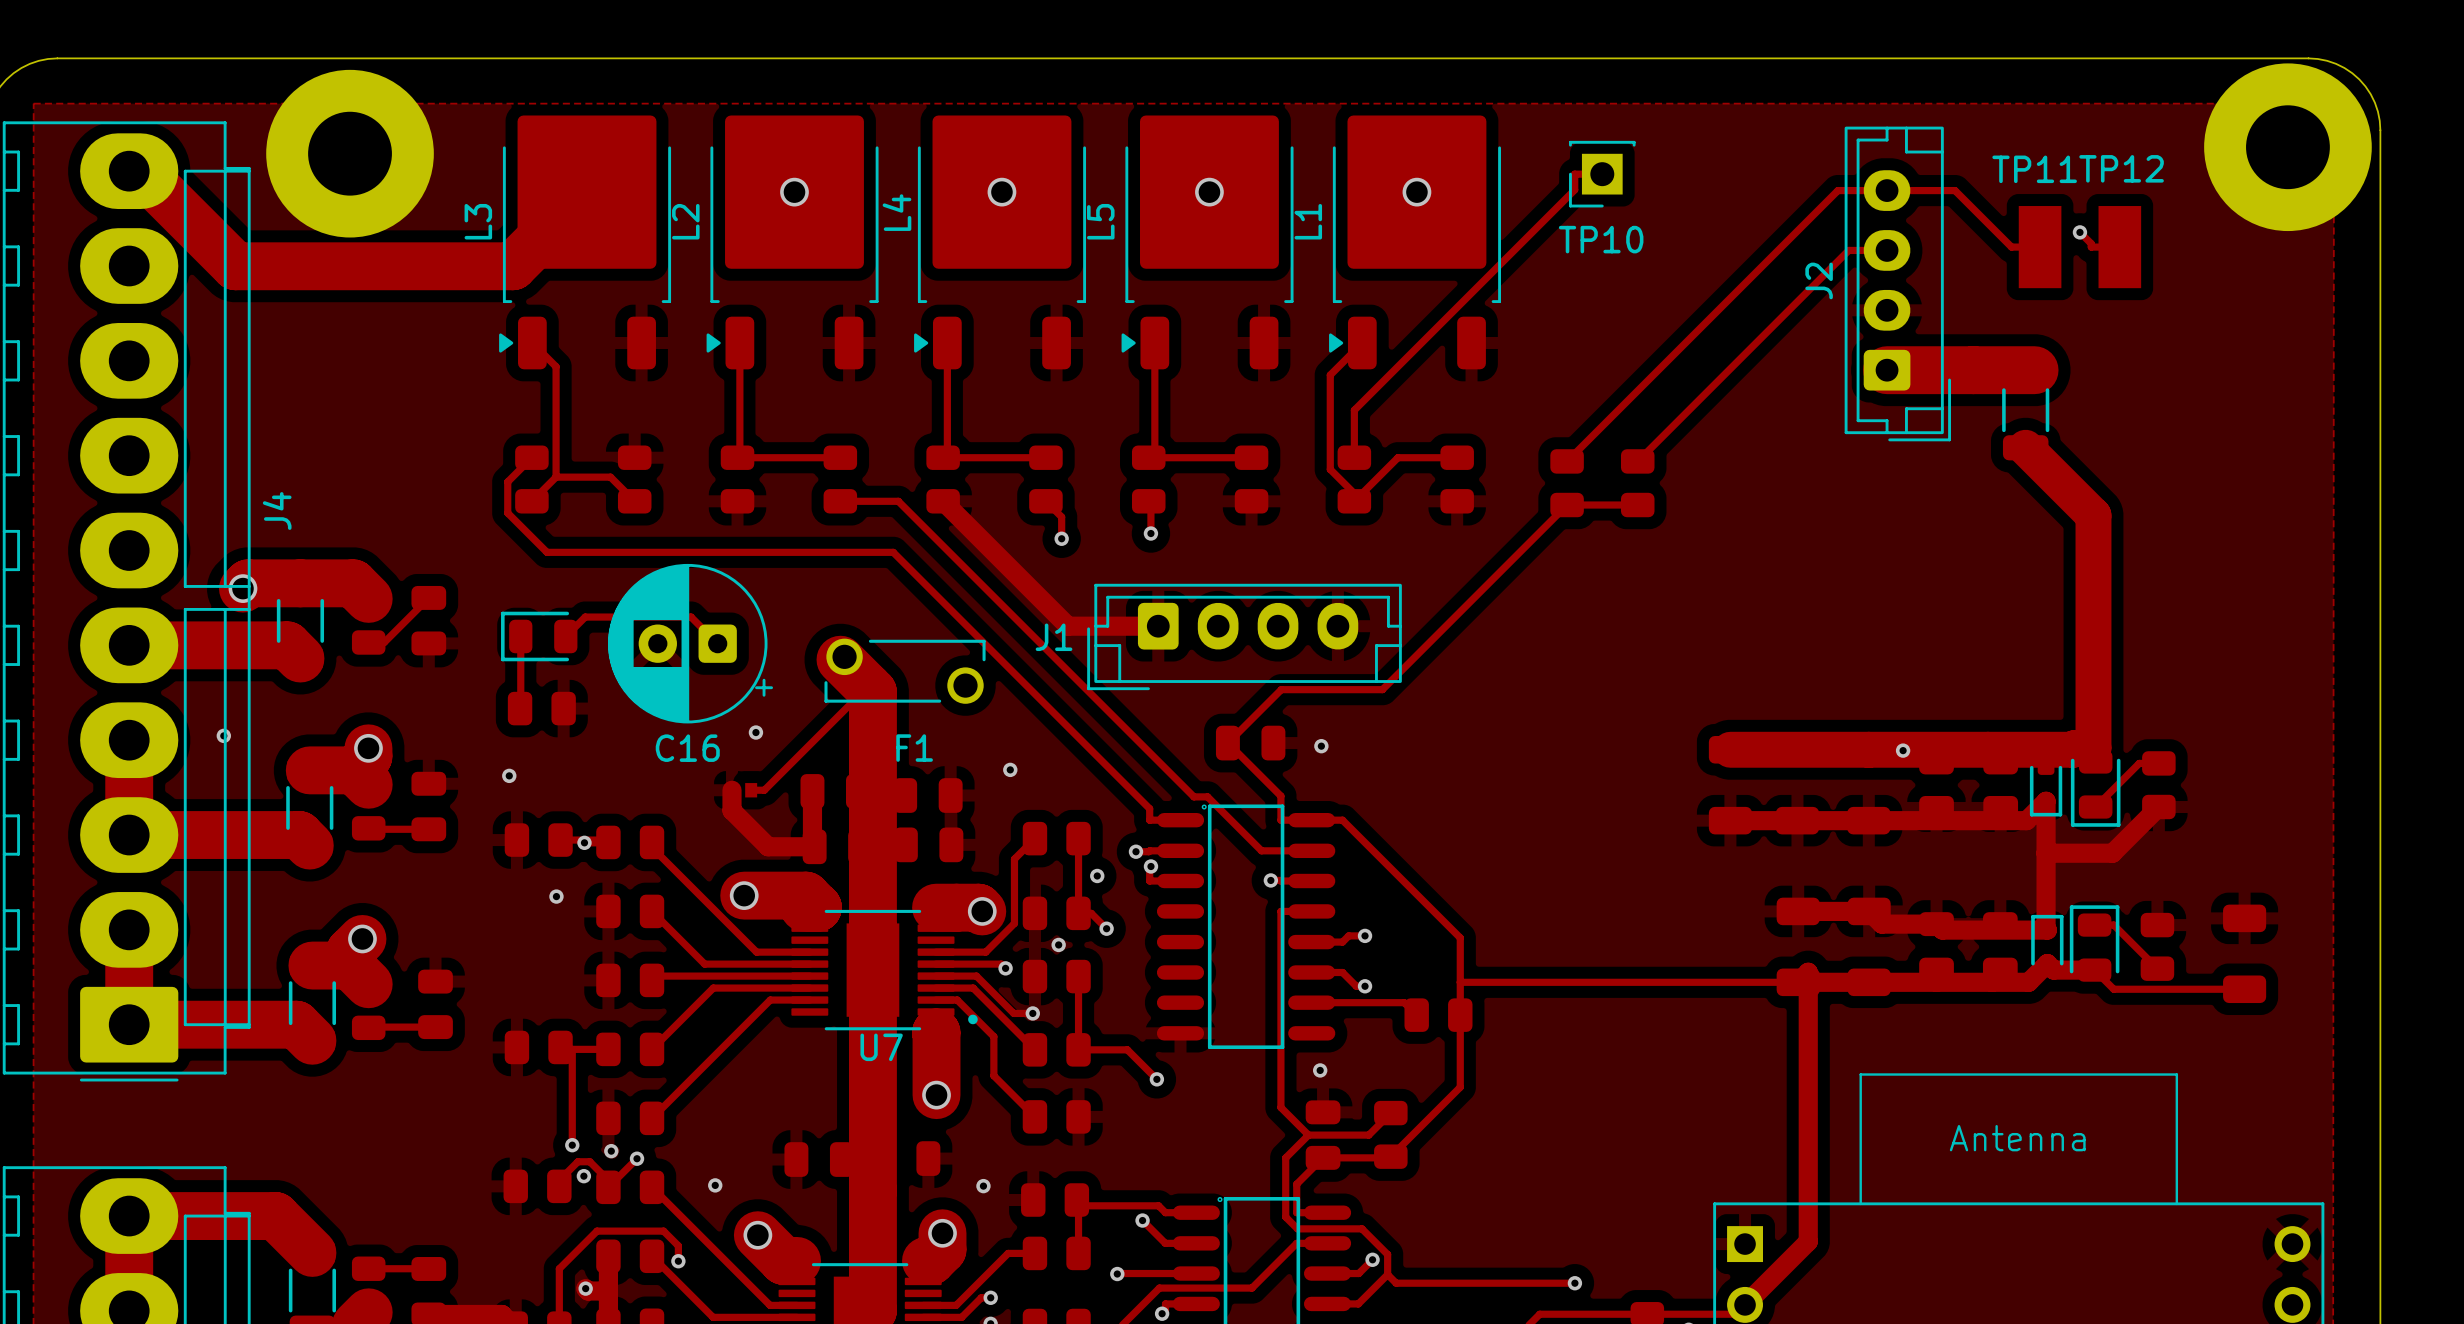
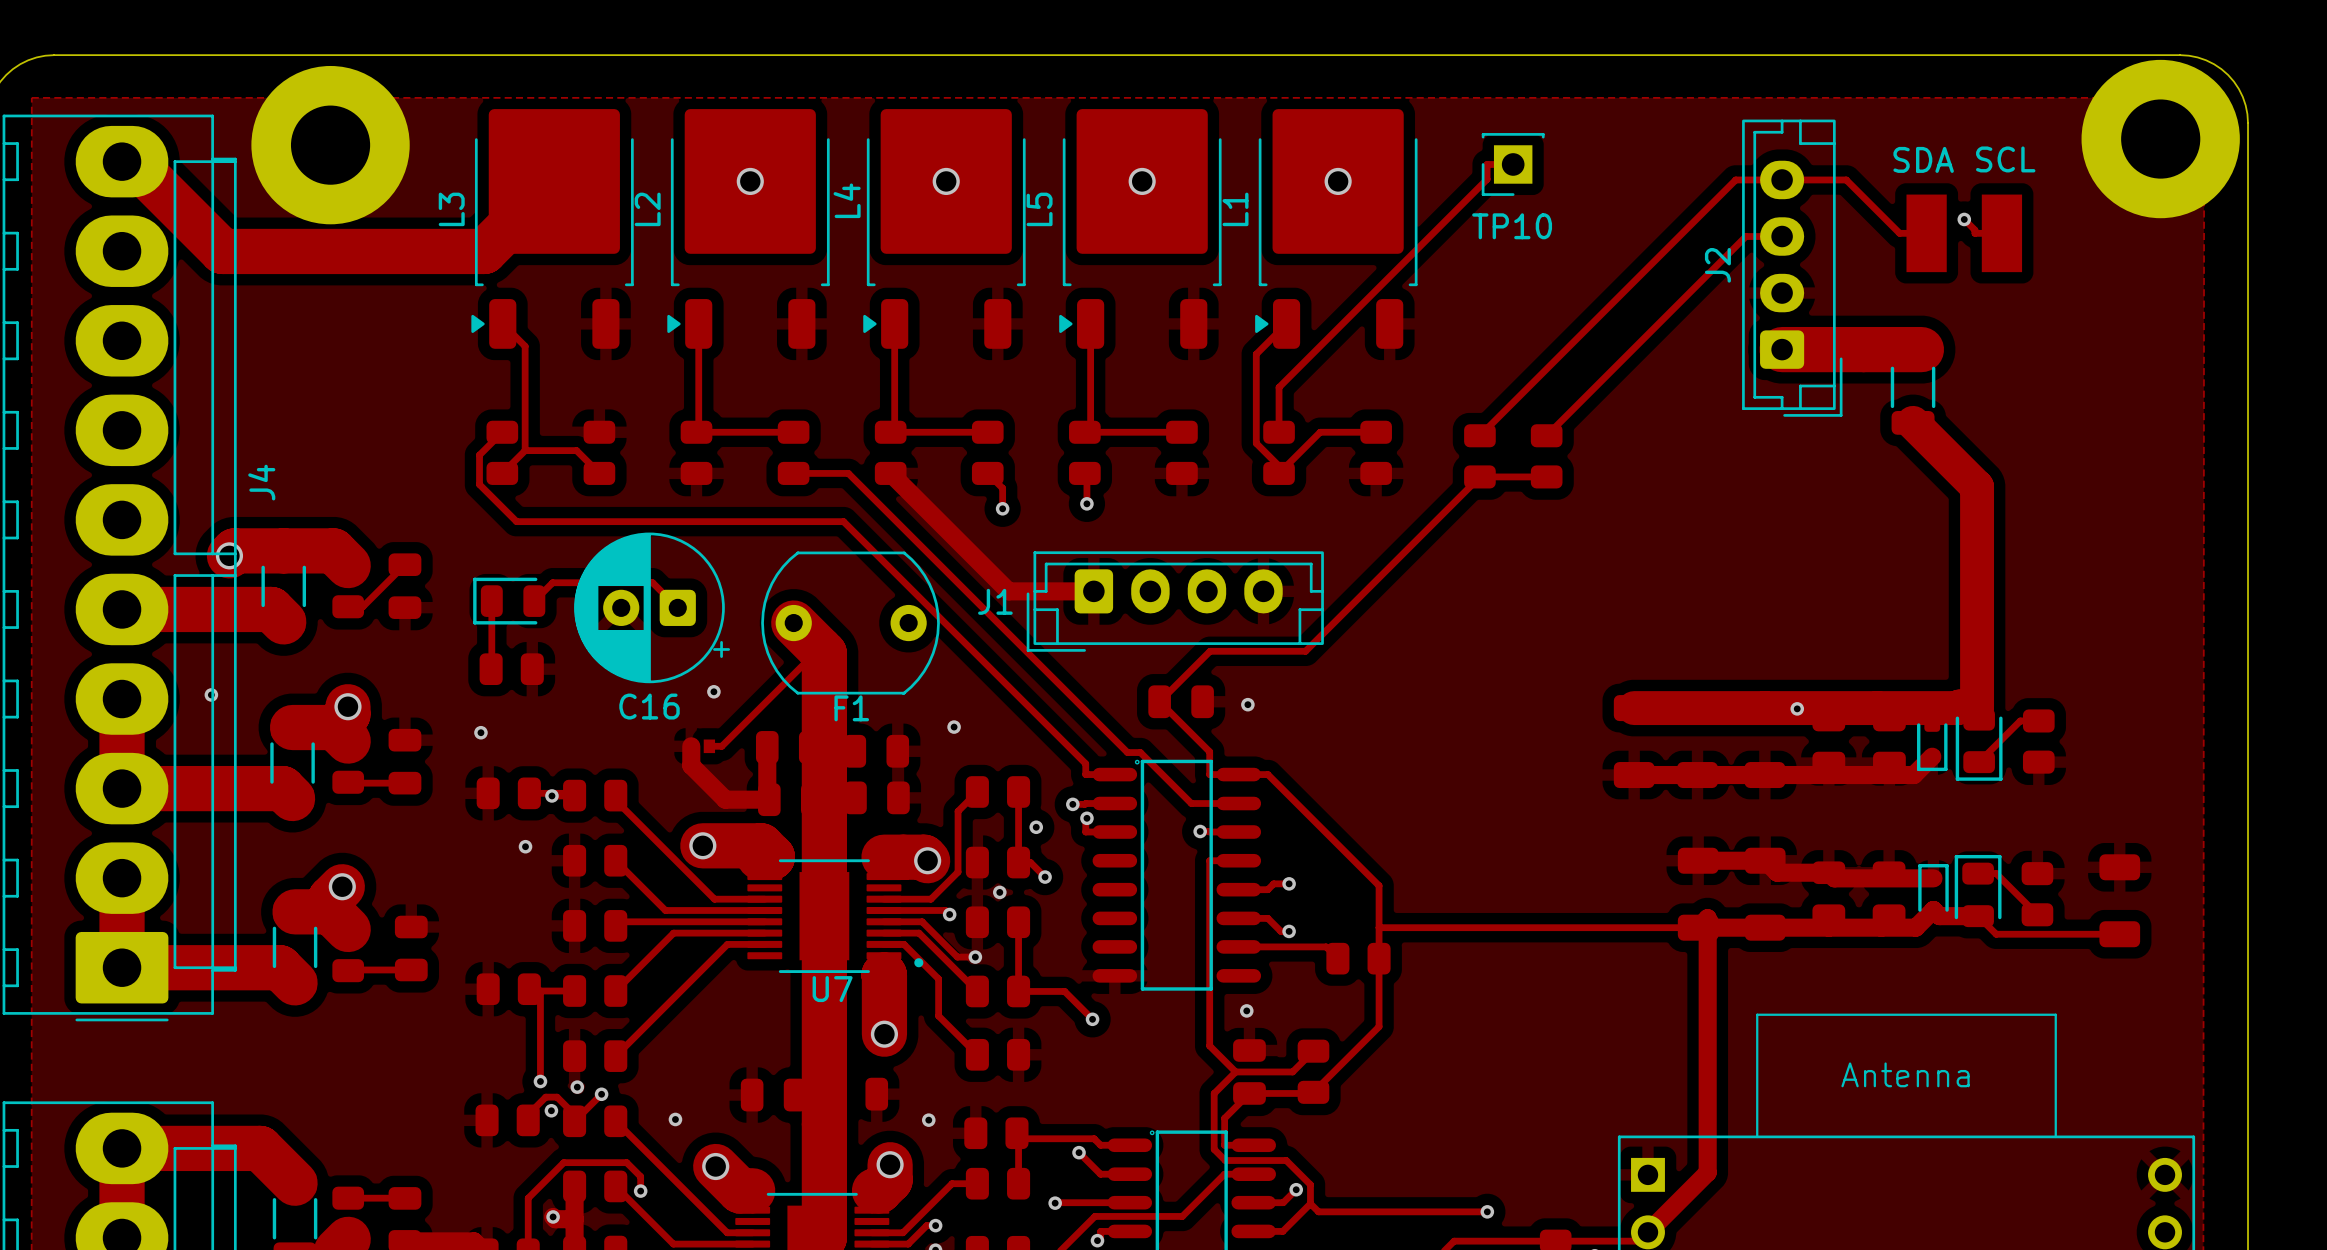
TP12 name: TP12 (2121, 168) -> SCL (2005, 159)
TP11 name: TP11 (2034, 169) -> SDA (1923, 159)
F1 footprint: [824, 638, 986, 704] -> [761, 551, 940, 695]
track: (2046, 801) (2047, 930) -> none
track: (2158, 807) (2112, 853) (2046, 853) -> none

